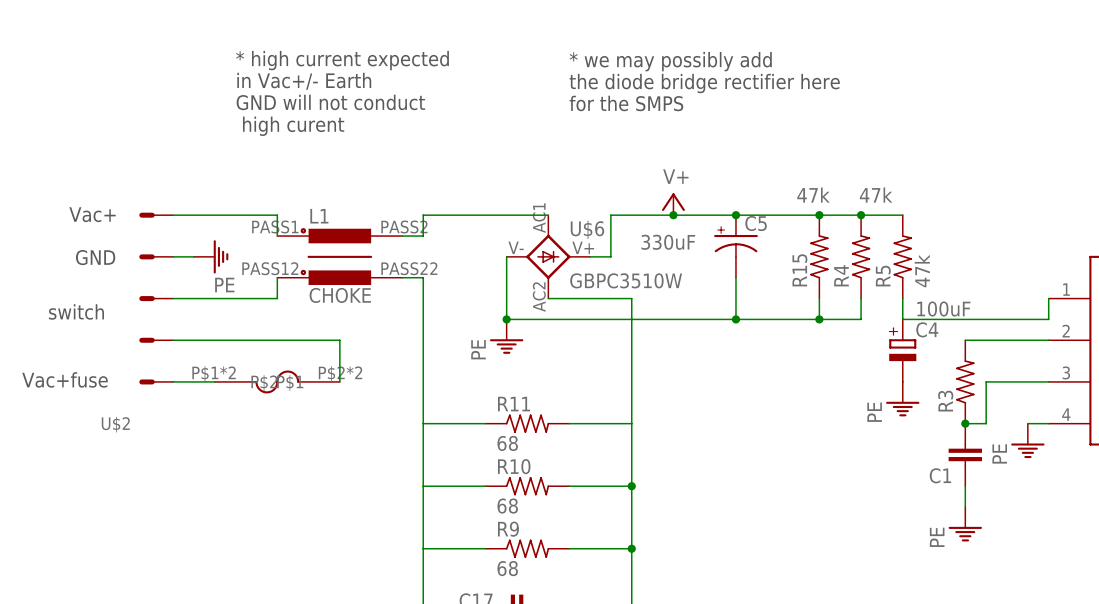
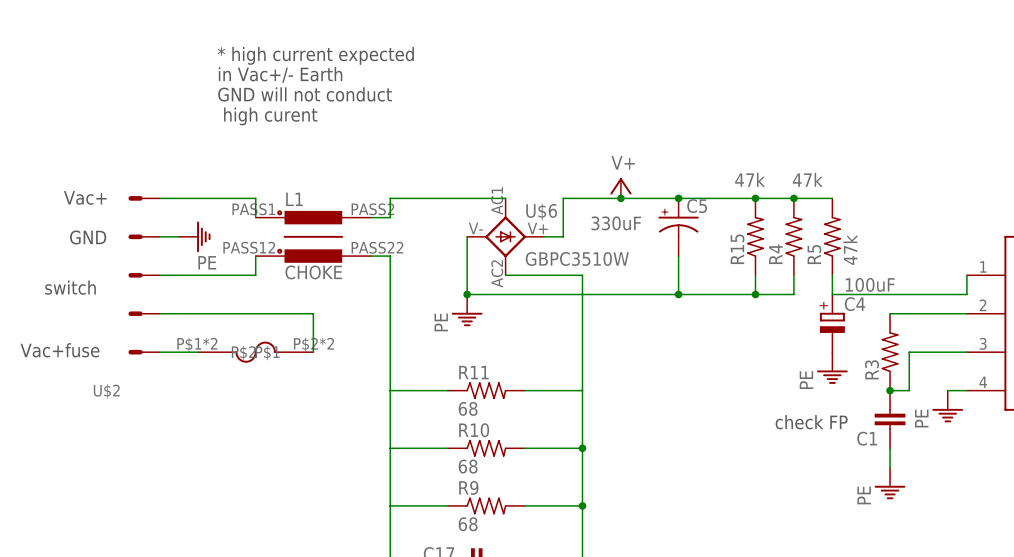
text: * we may possibly add (670, 61) -> none
text: the diode bridge rectifier here (704, 83) -> none
text: for the SMPS (626, 103) -> none
text: none -> check FP (811, 422)

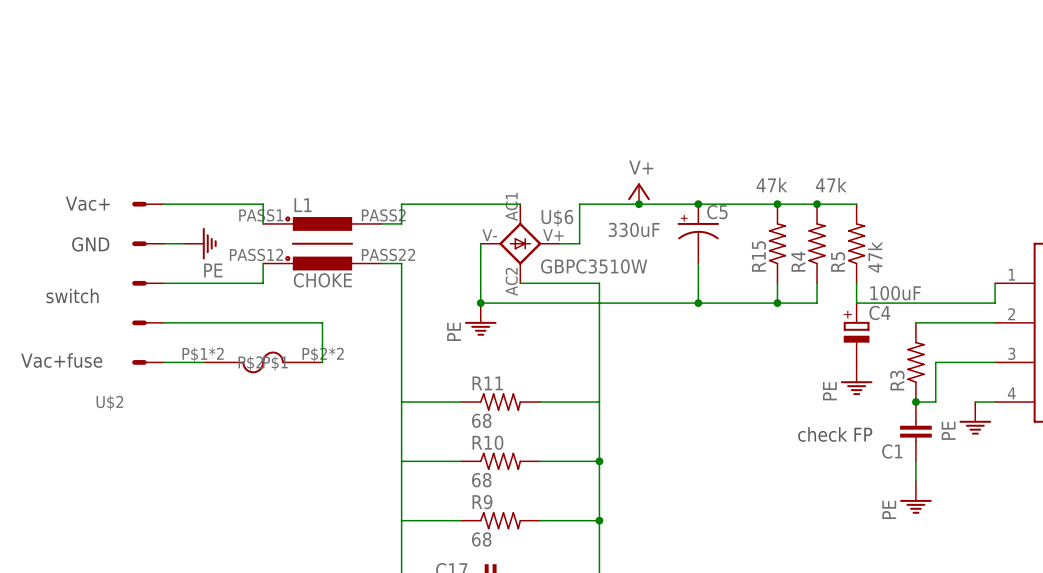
text: * high current expected (315, 55) -> none
text: in Vac+/- Earth (280, 74) -> none
text: GND will not conduct (305, 94) -> none
text: high curent (270, 116) -> none

